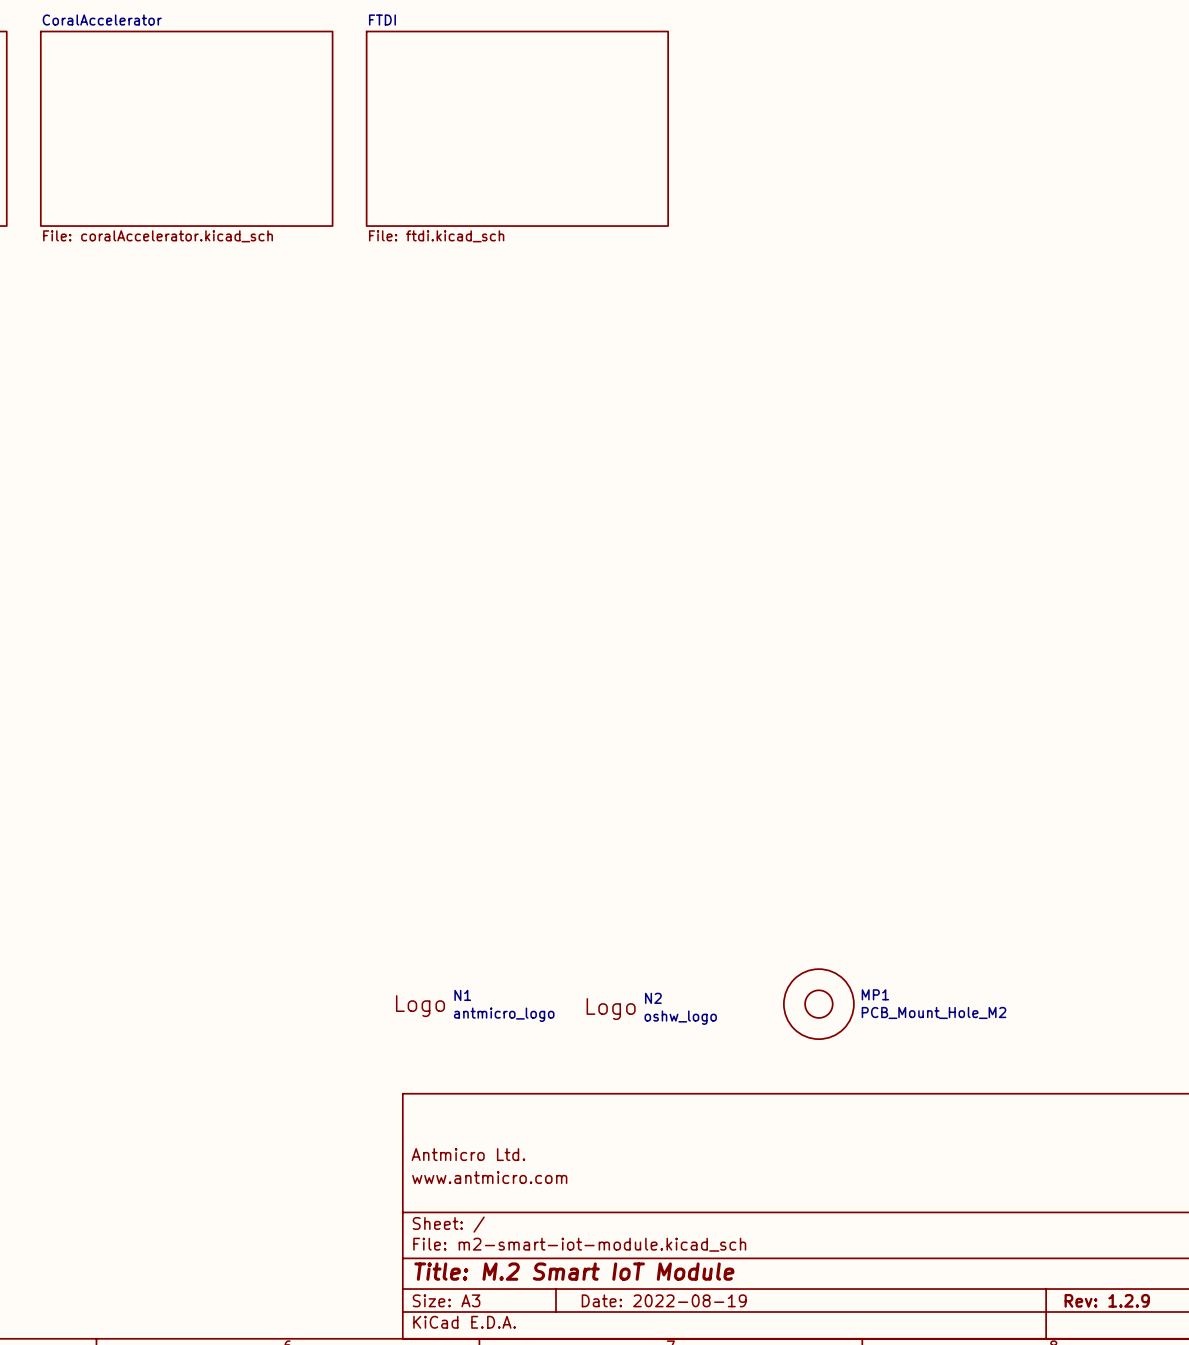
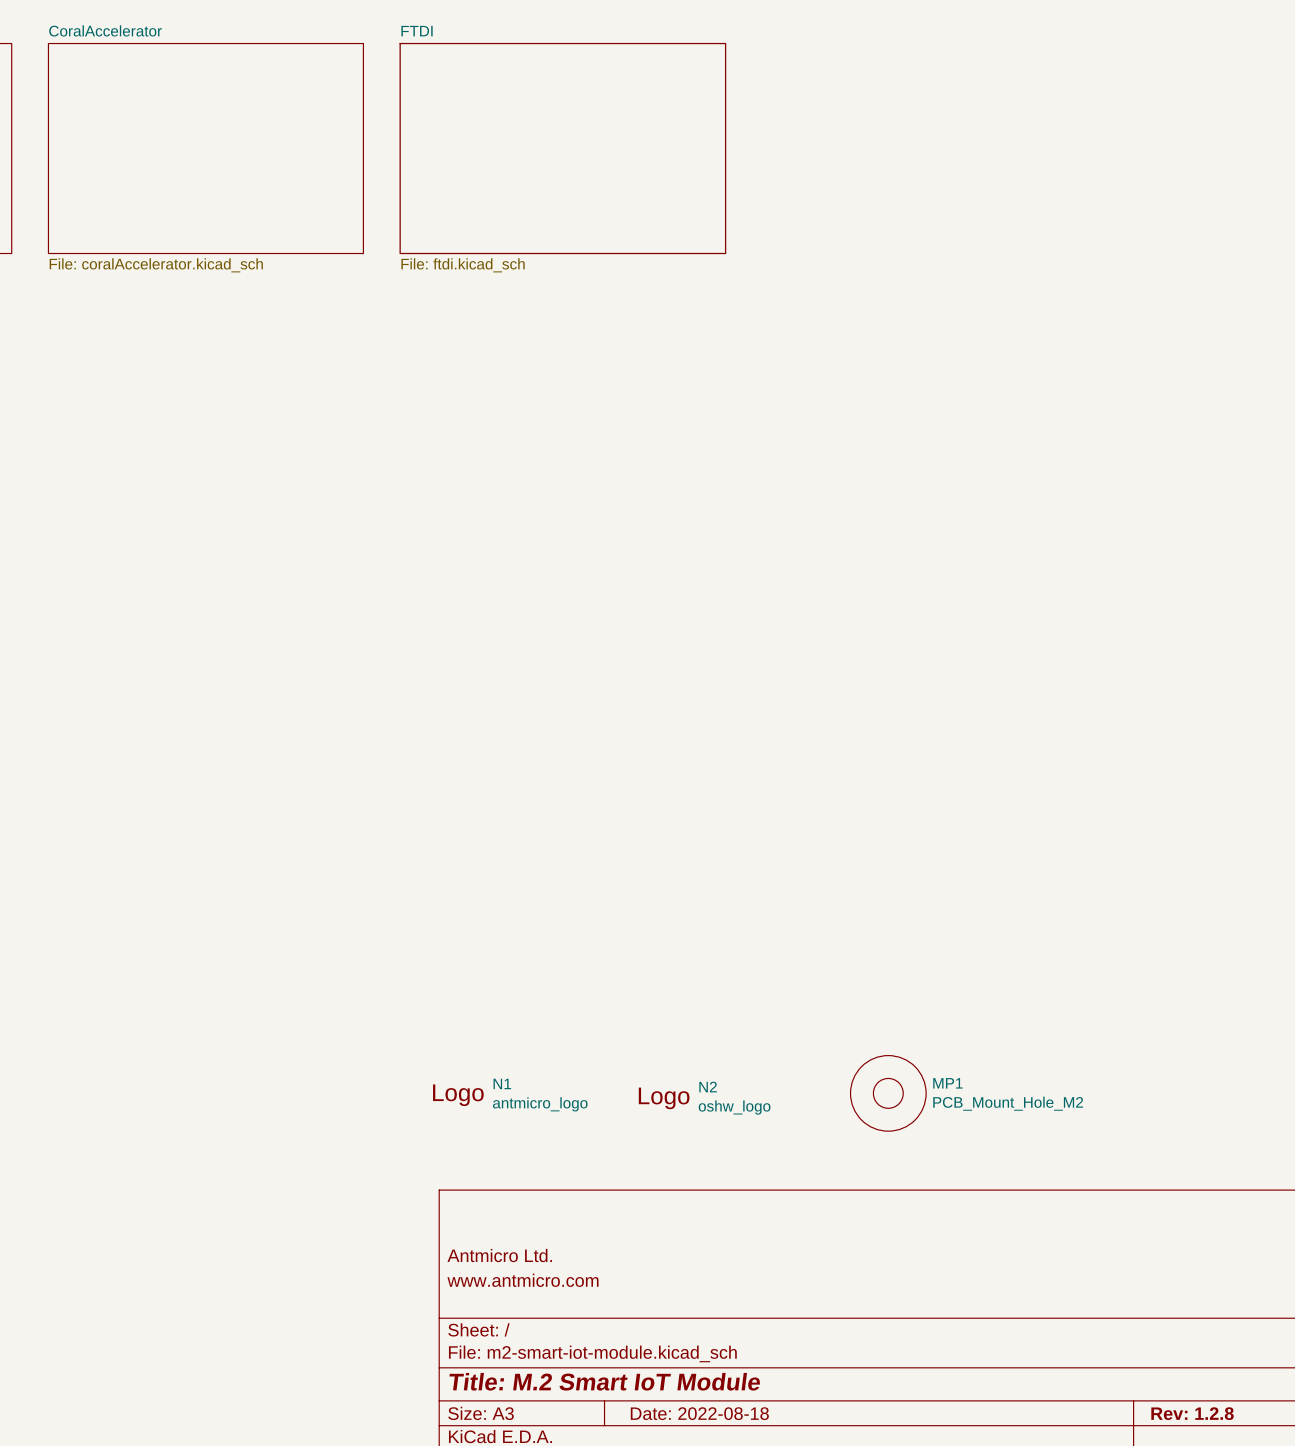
title block: Date: 2022-08-19 (664, 1300) -> Date: 2022-08-18 (699, 1413)
title block: Rev: 1.2.9 (1107, 1300) -> Rev: 1.2.8 (1192, 1413)

